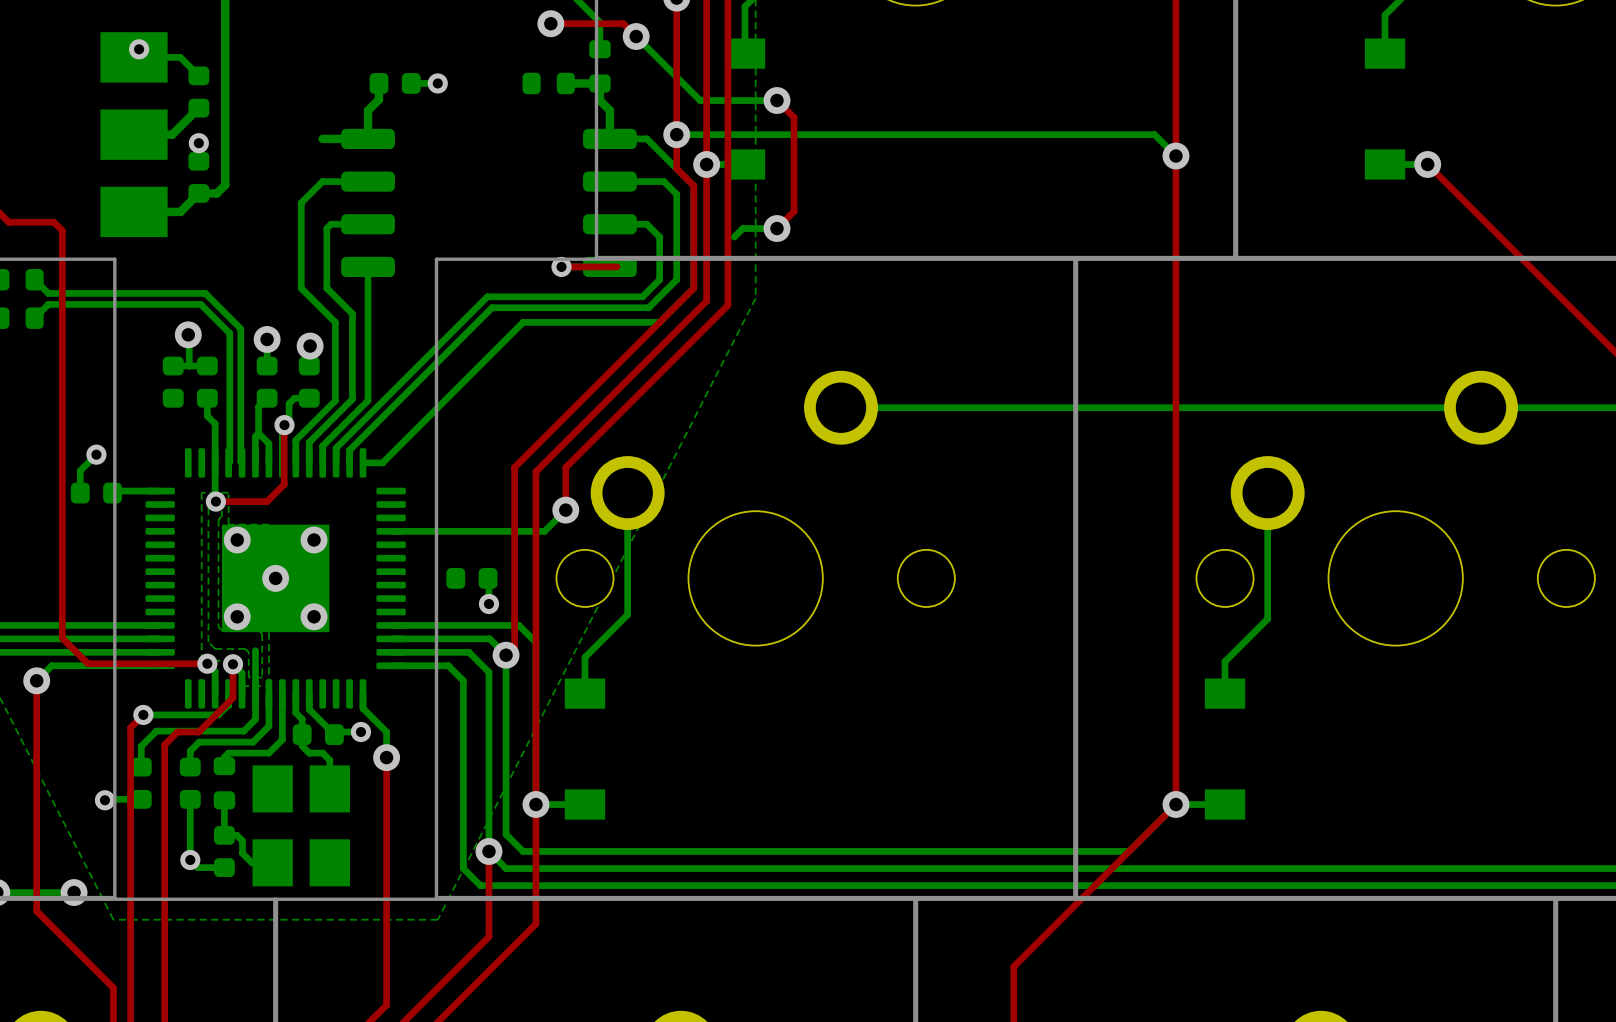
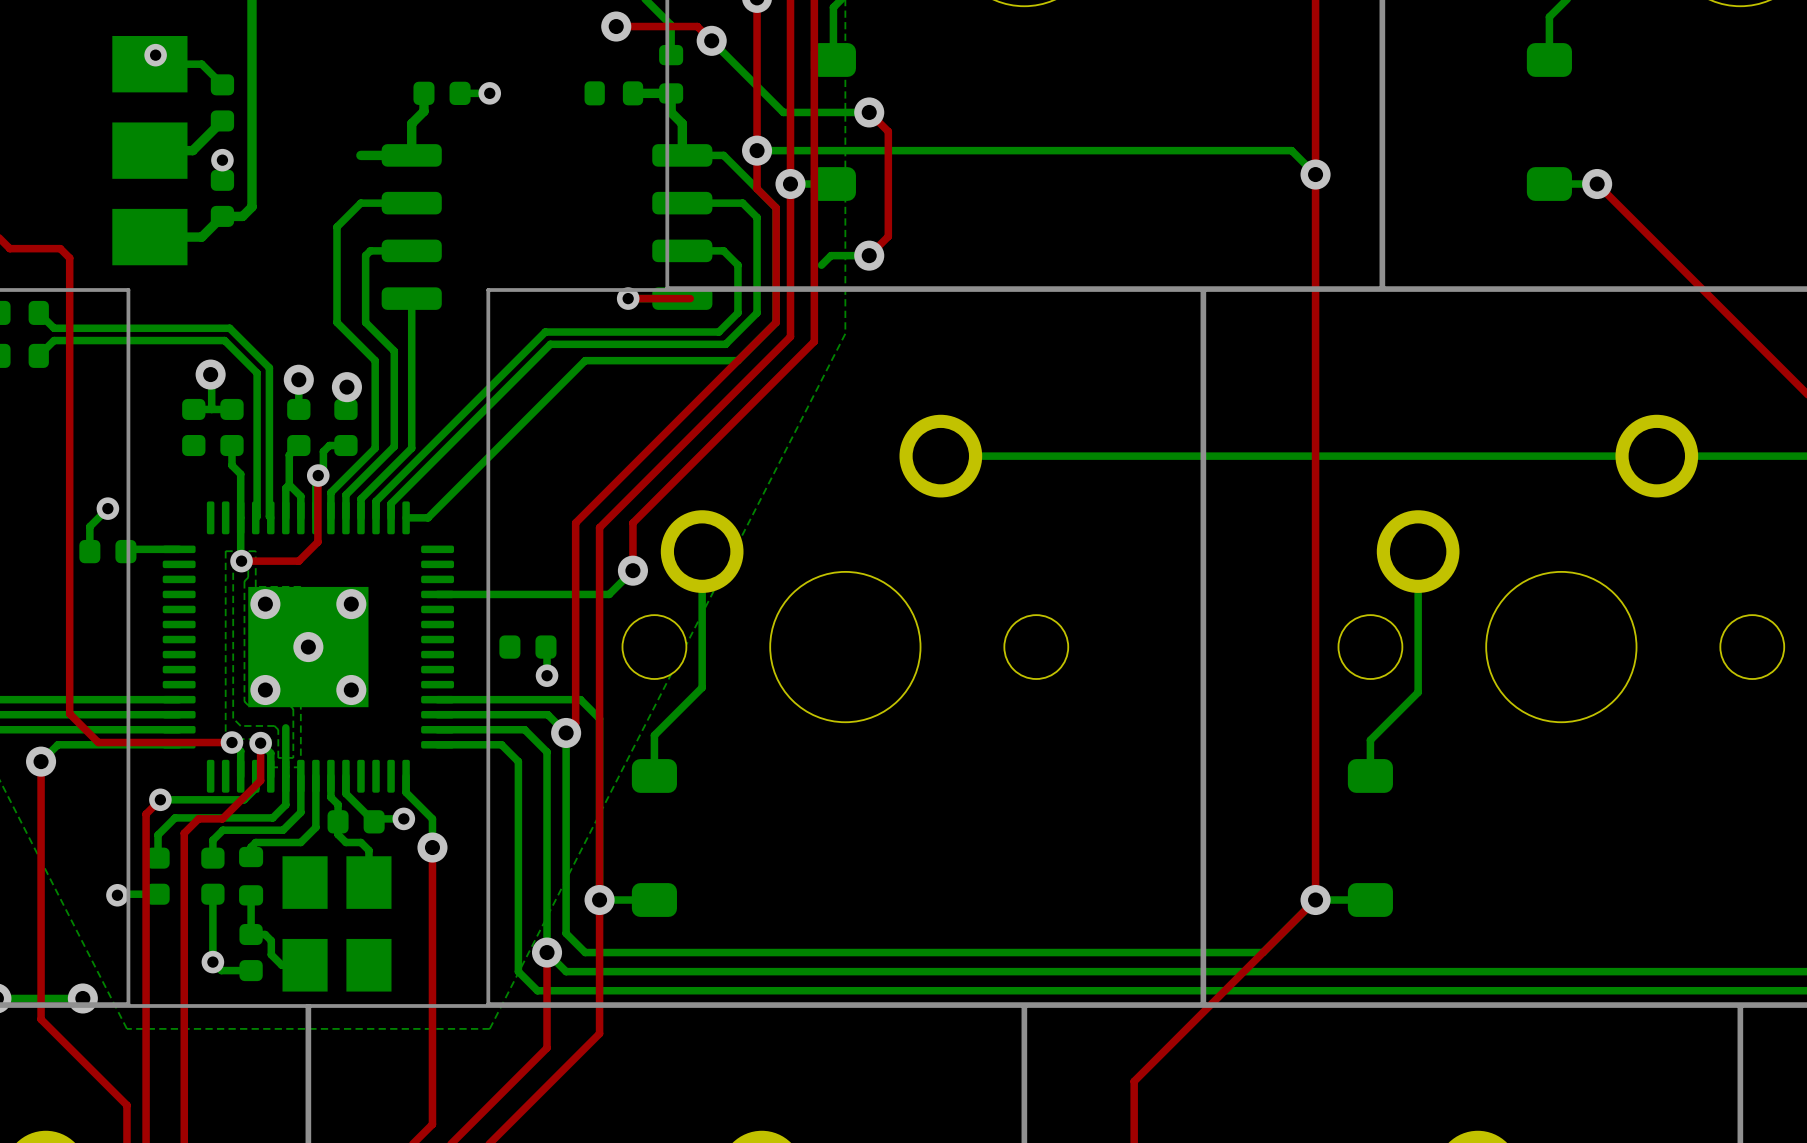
part footprint: [724, 38, 766, 180] -> [810, 43, 856, 201]
part footprint: [1364, 38, 1406, 180] -> [1526, 43, 1572, 201]
part footprint: [564, 678, 606, 820] -> [631, 759, 677, 917]
part footprint: [1204, 678, 1246, 820] -> [1347, 759, 1393, 917]

